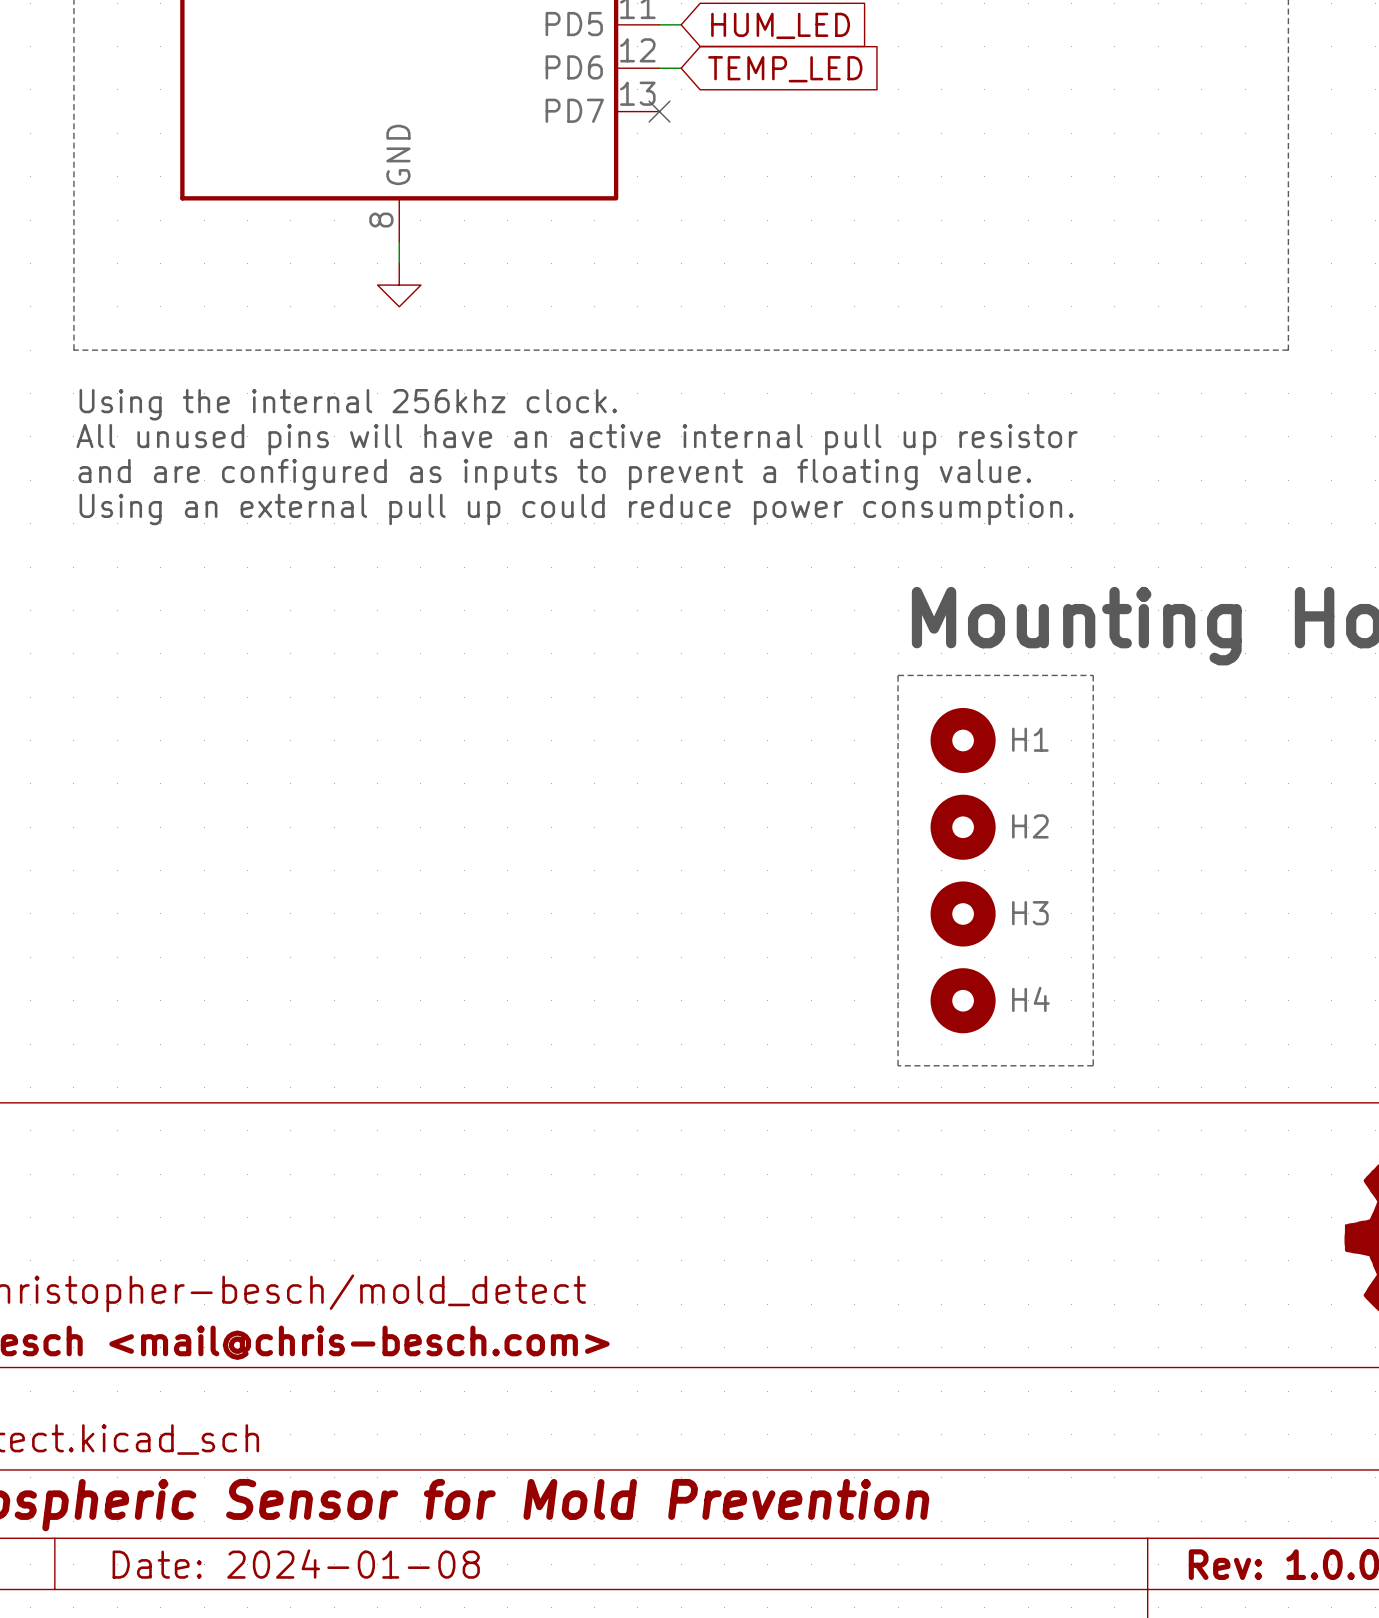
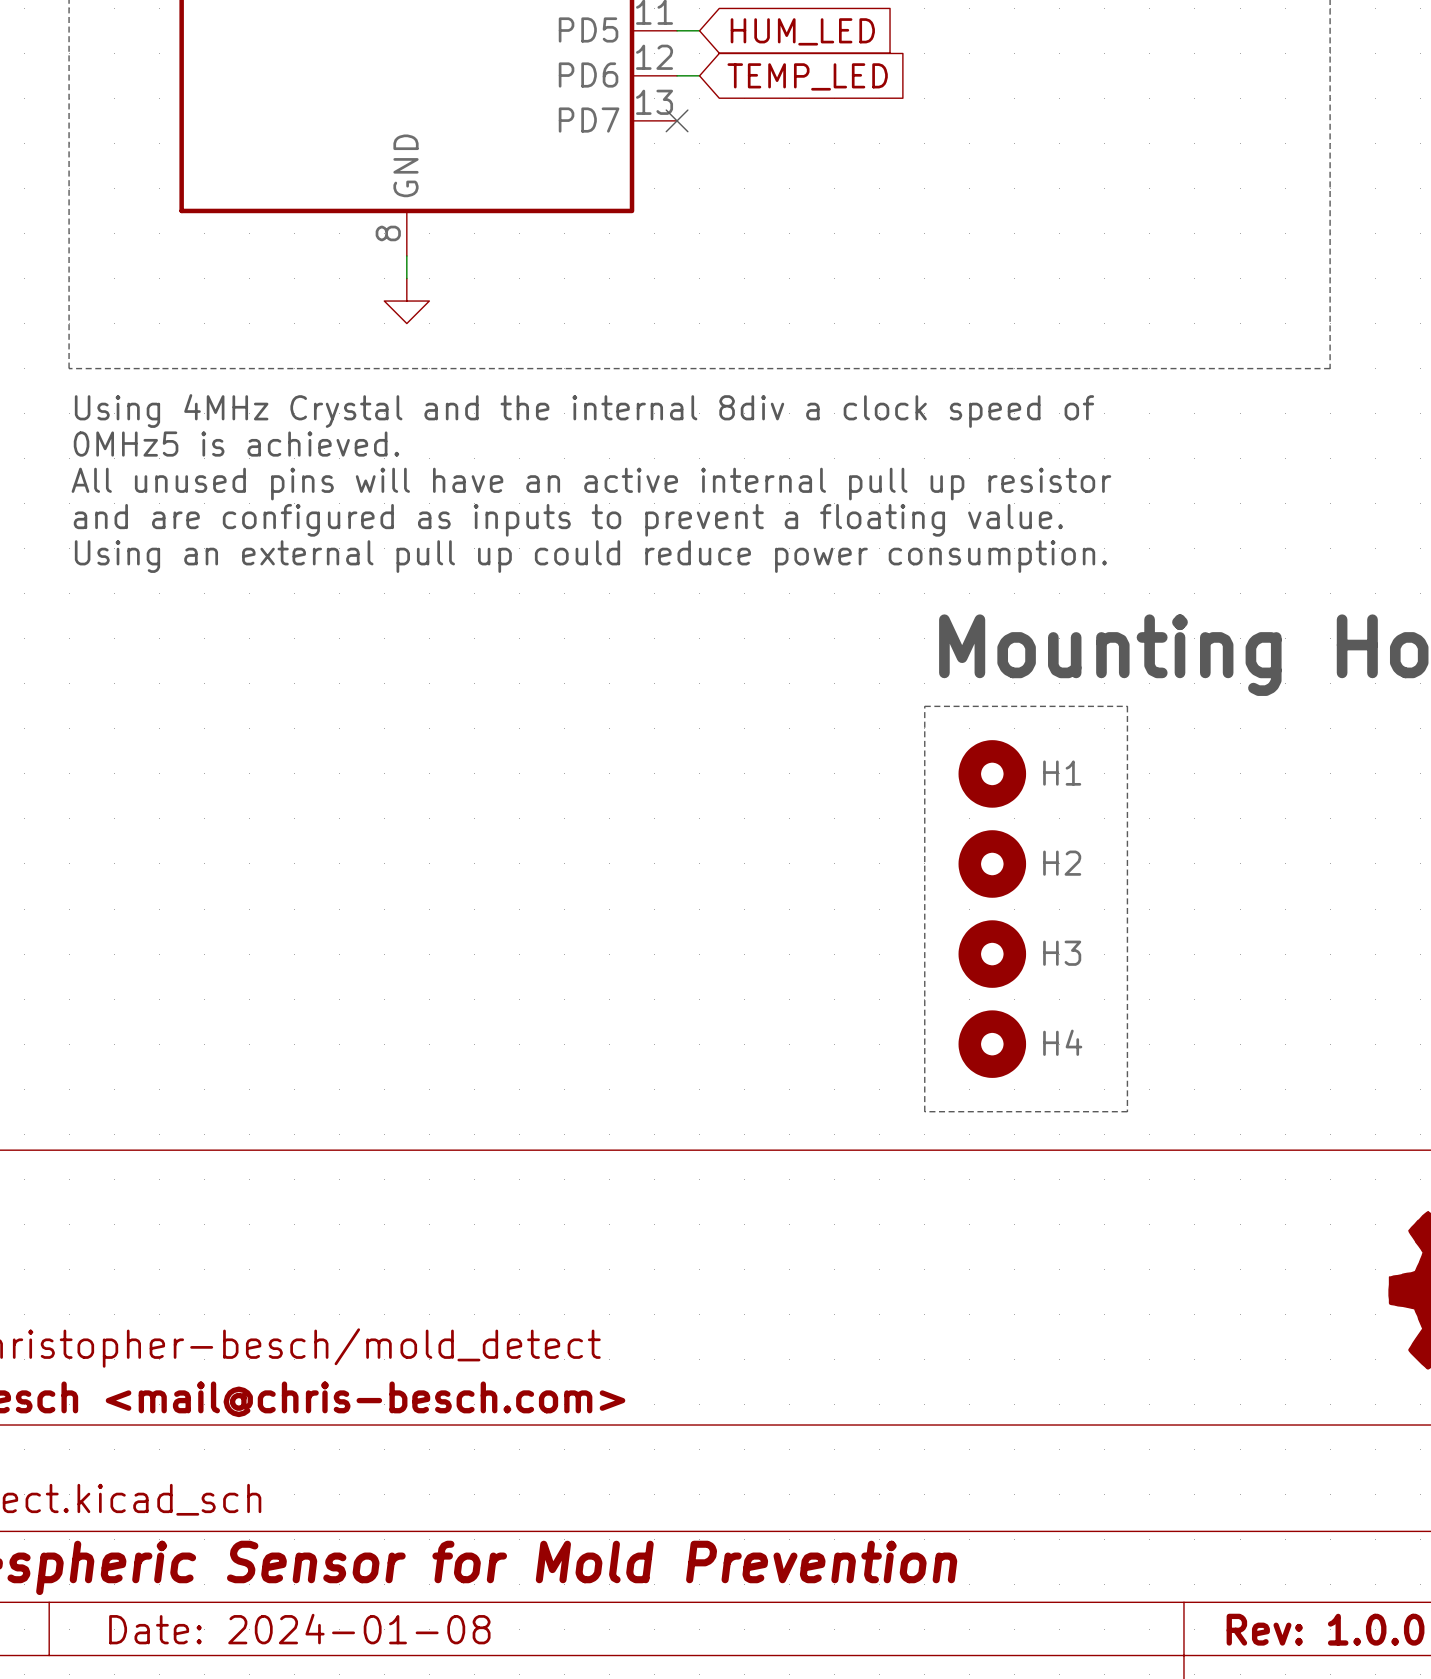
text: none -> Using 4MHz Crystal and the internal 8div a clock speed of (584, 411)
text: Using the internal 256khz clock. (348, 404) -> none
text: none -> 0MHz5 is achieved. (236, 444)
text position: All unused pins will have an active internal pull up resistor (577, 439) -> All unused pins will have an active internal pull up resistor (591, 484)
text position: and are configured as inputs to prevent a floating value. (554, 474) -> and are configured as inputs to prevent a floating value. (568, 520)
text position: Using an external pull up could reduce power consumption. (576, 509) -> Using an external pull up could reduce power consumption. (590, 556)

